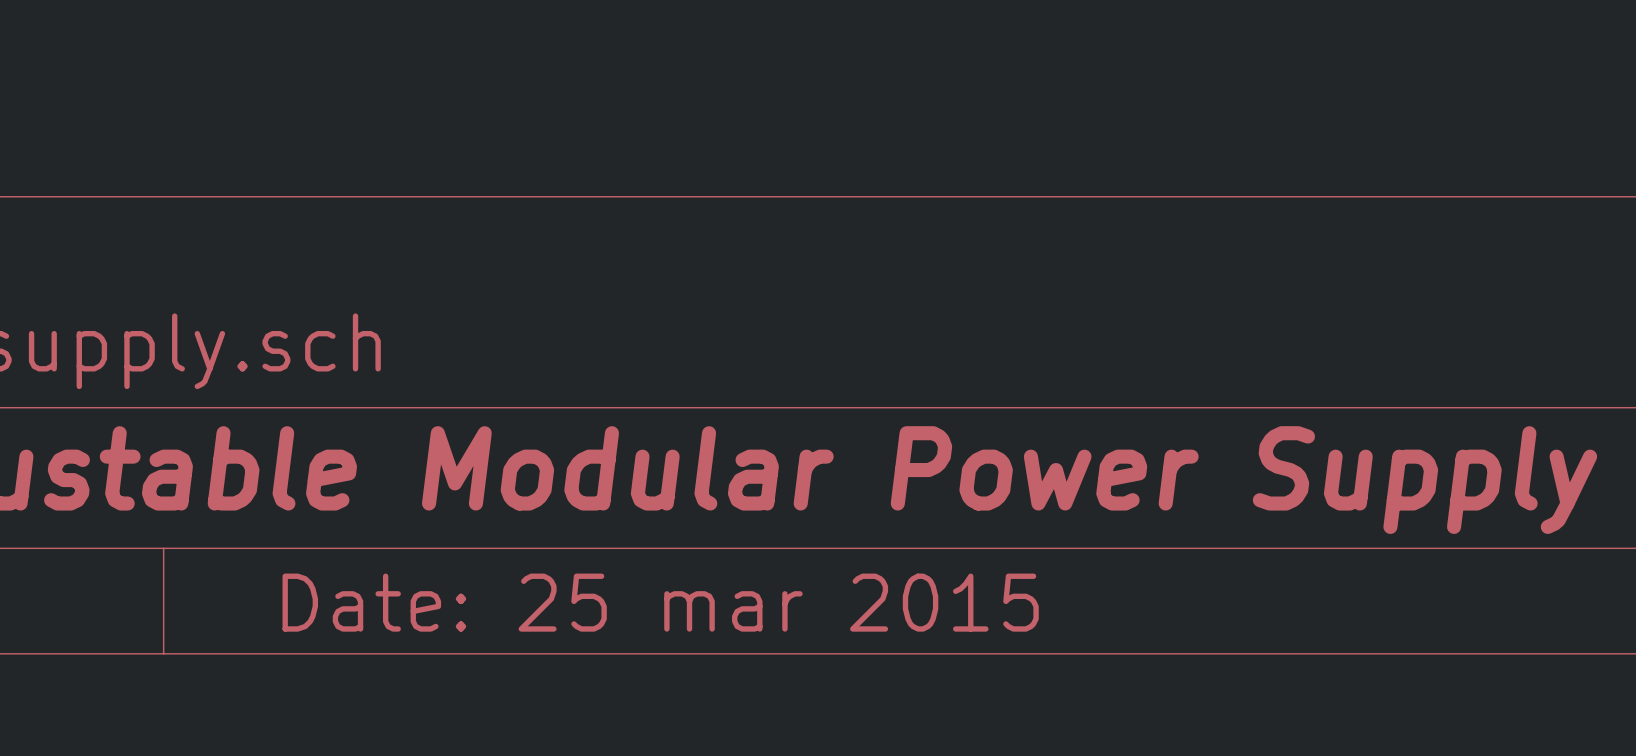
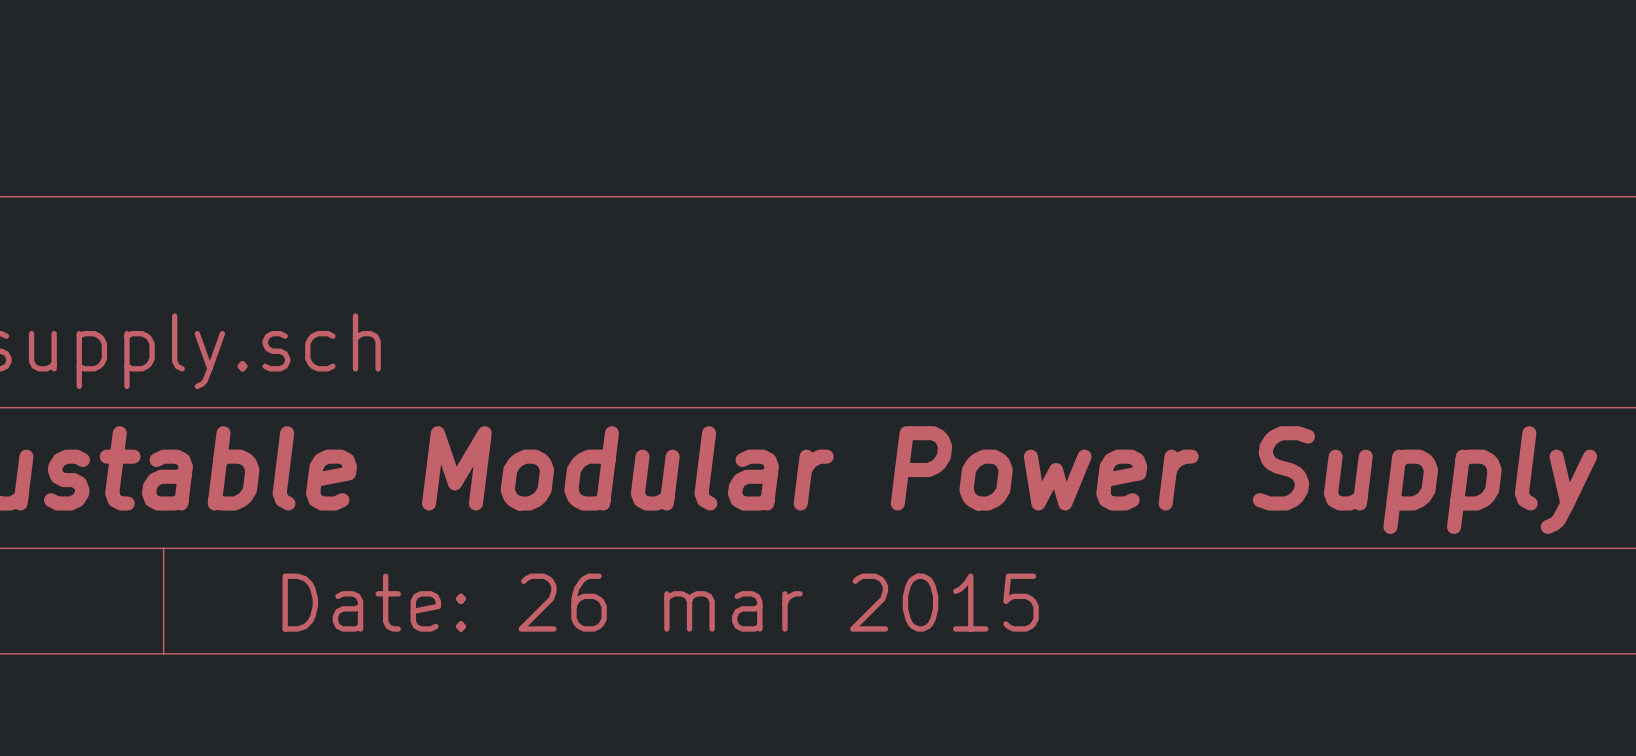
title block: Date: 25 mar 2015 (660, 602) -> Date: 26 mar 2015 (660, 602)

